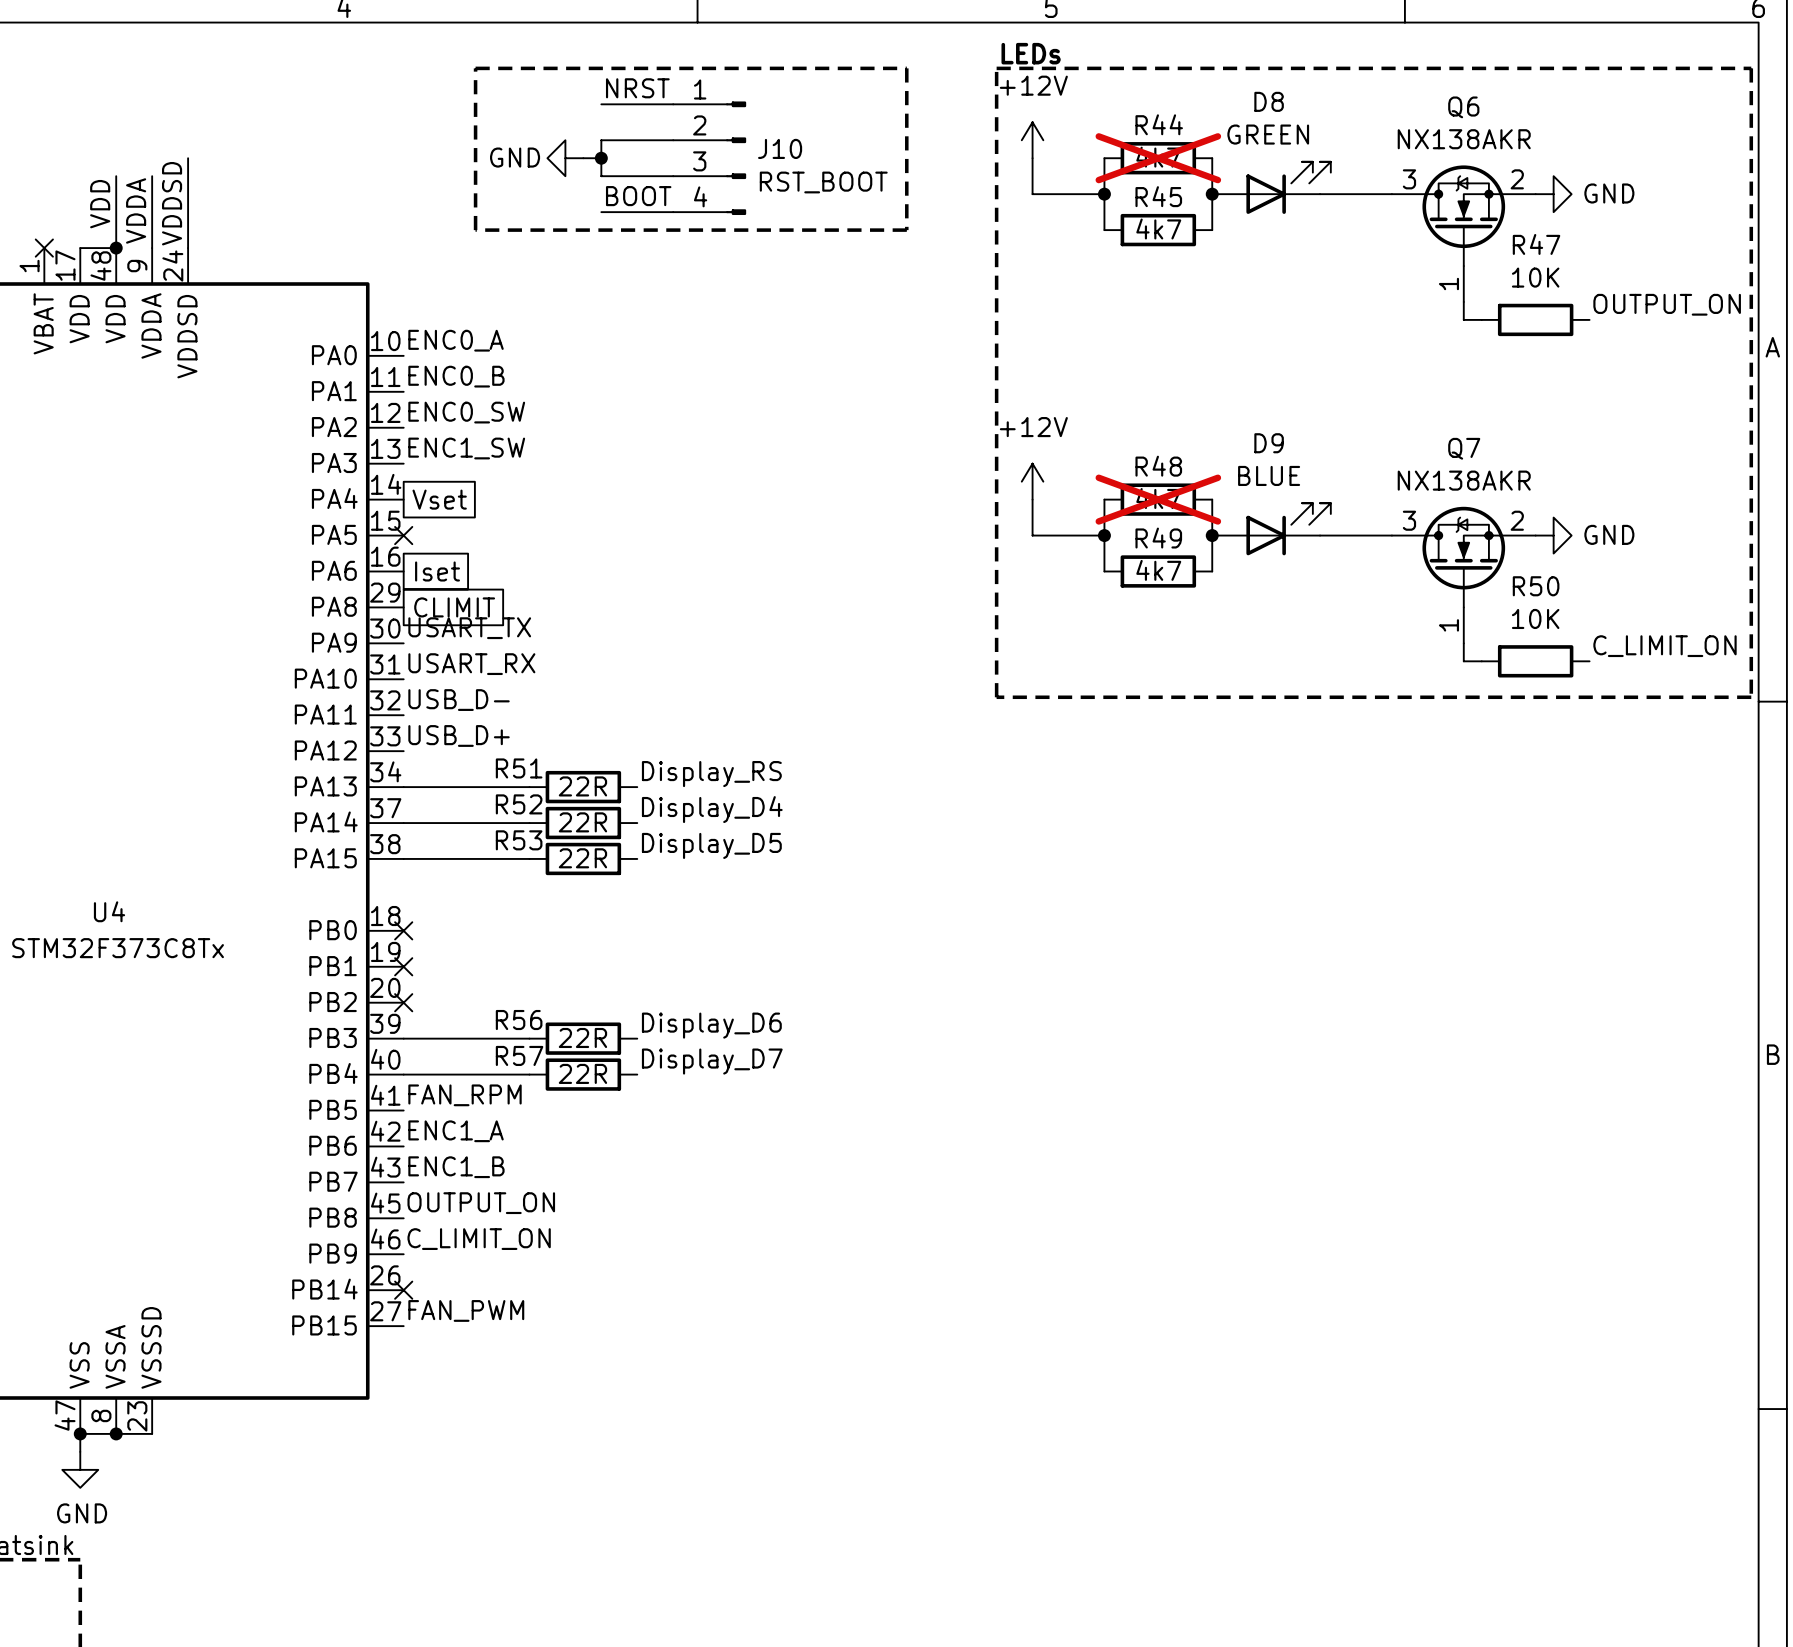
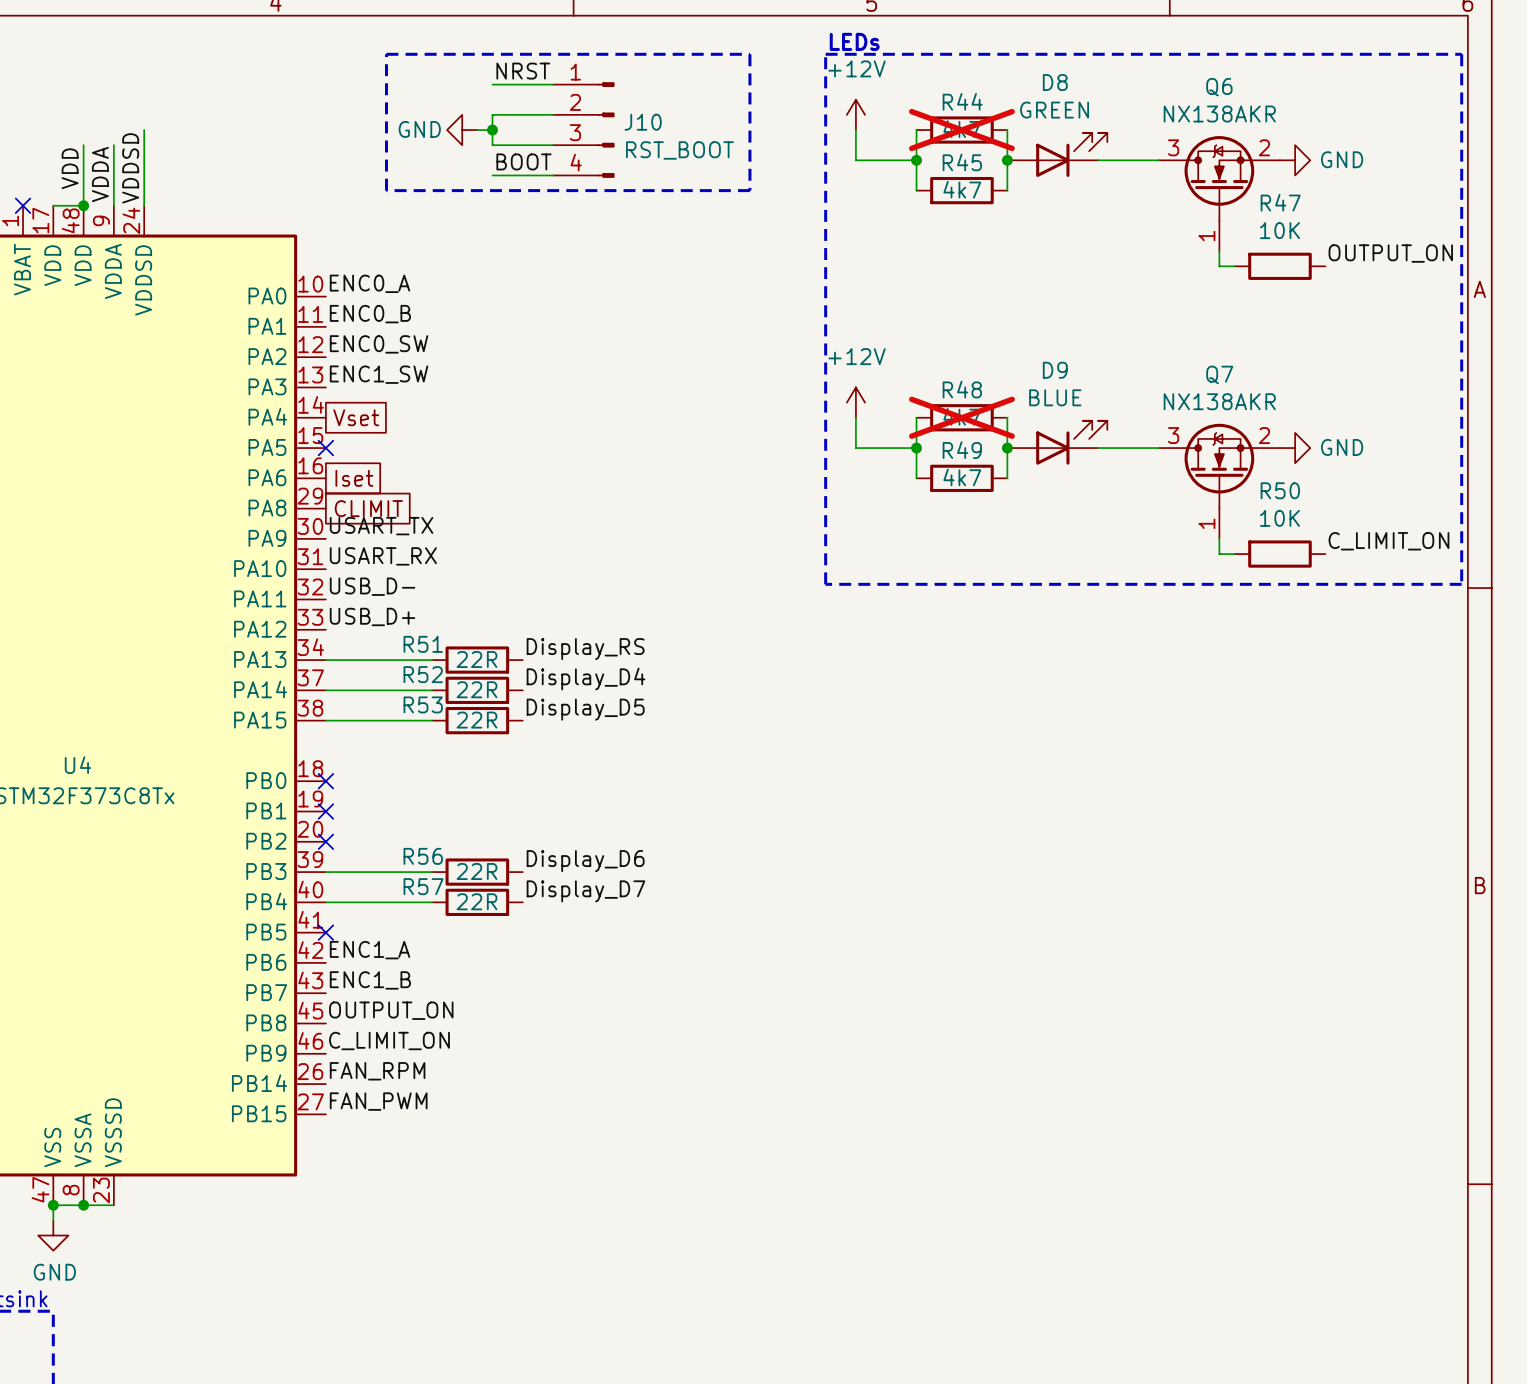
label position: FAN_RPM (465, 1095) -> FAN_RPM (377, 1071)
no-connect mark: none -> (325, 932)
no-connect mark: (403, 1290) -> none

